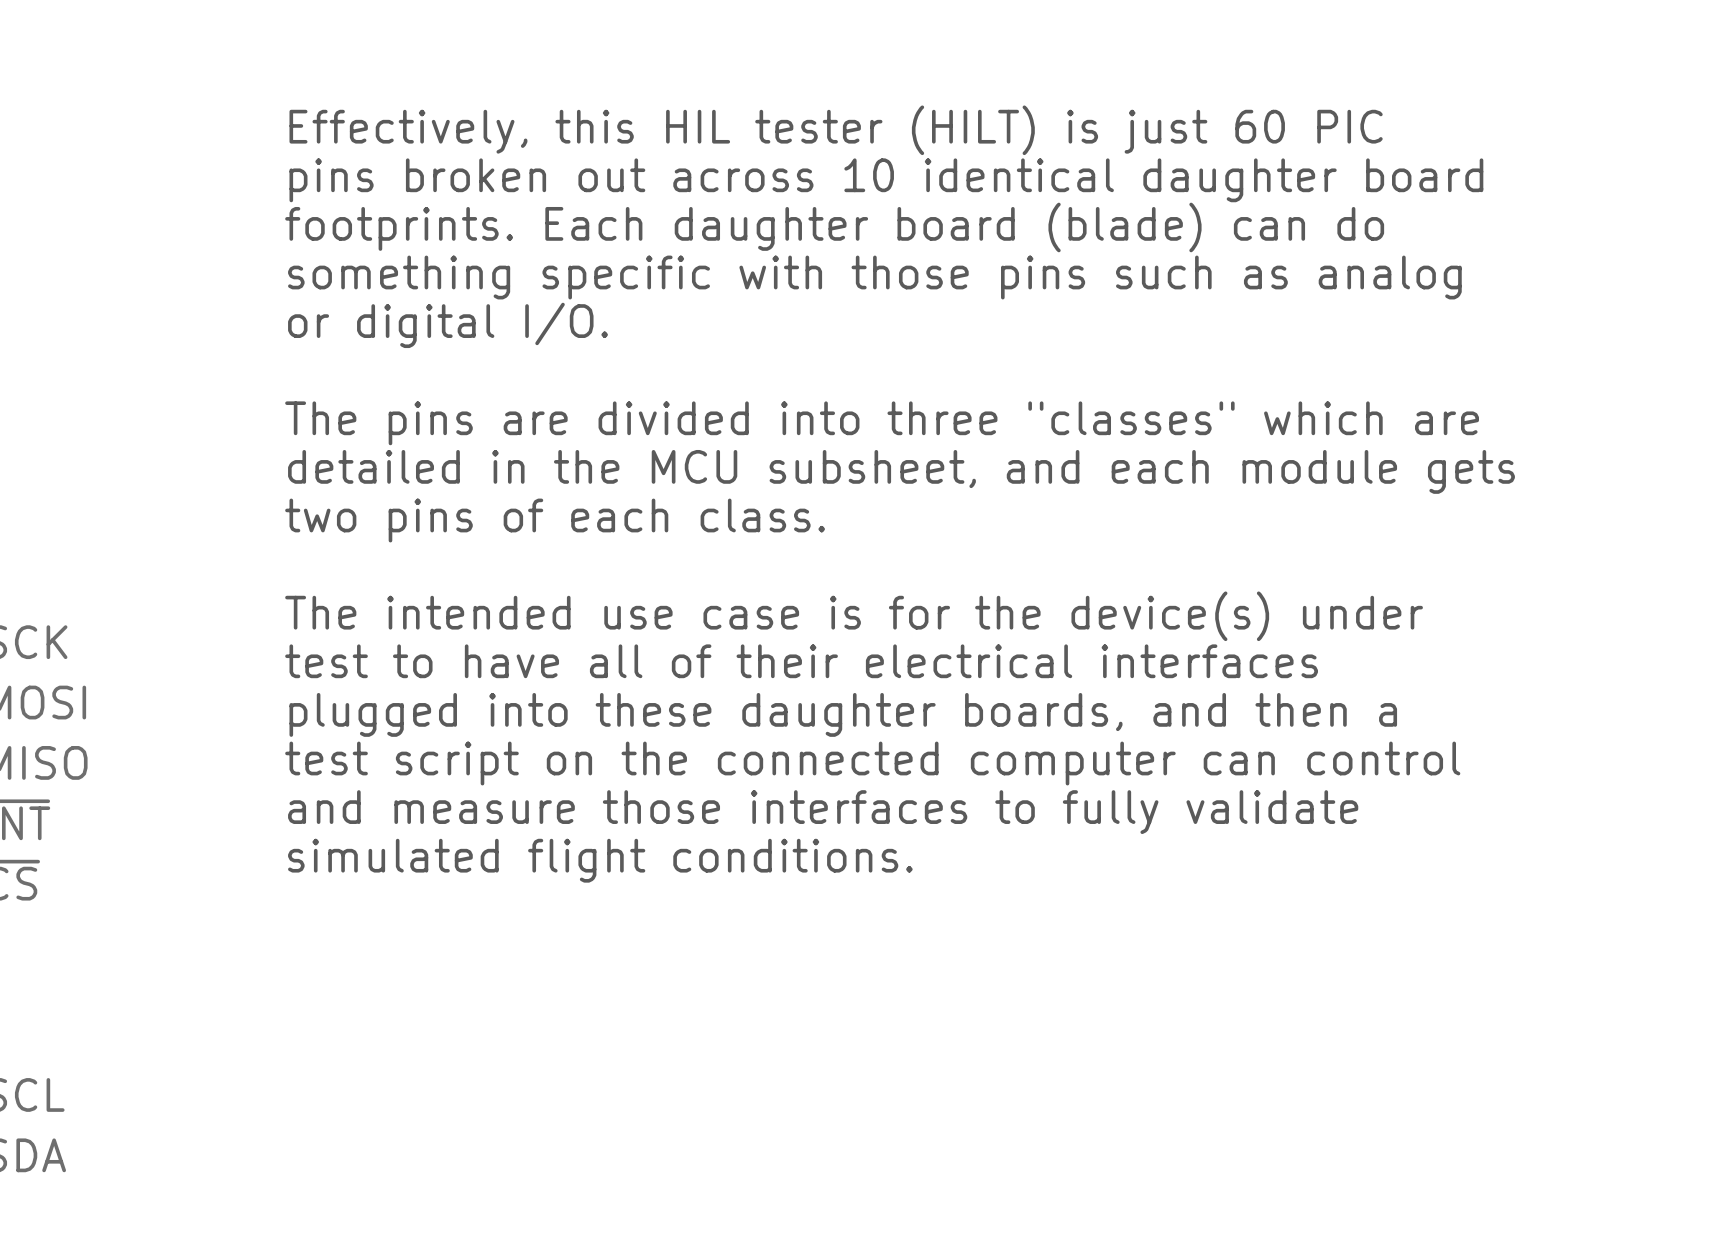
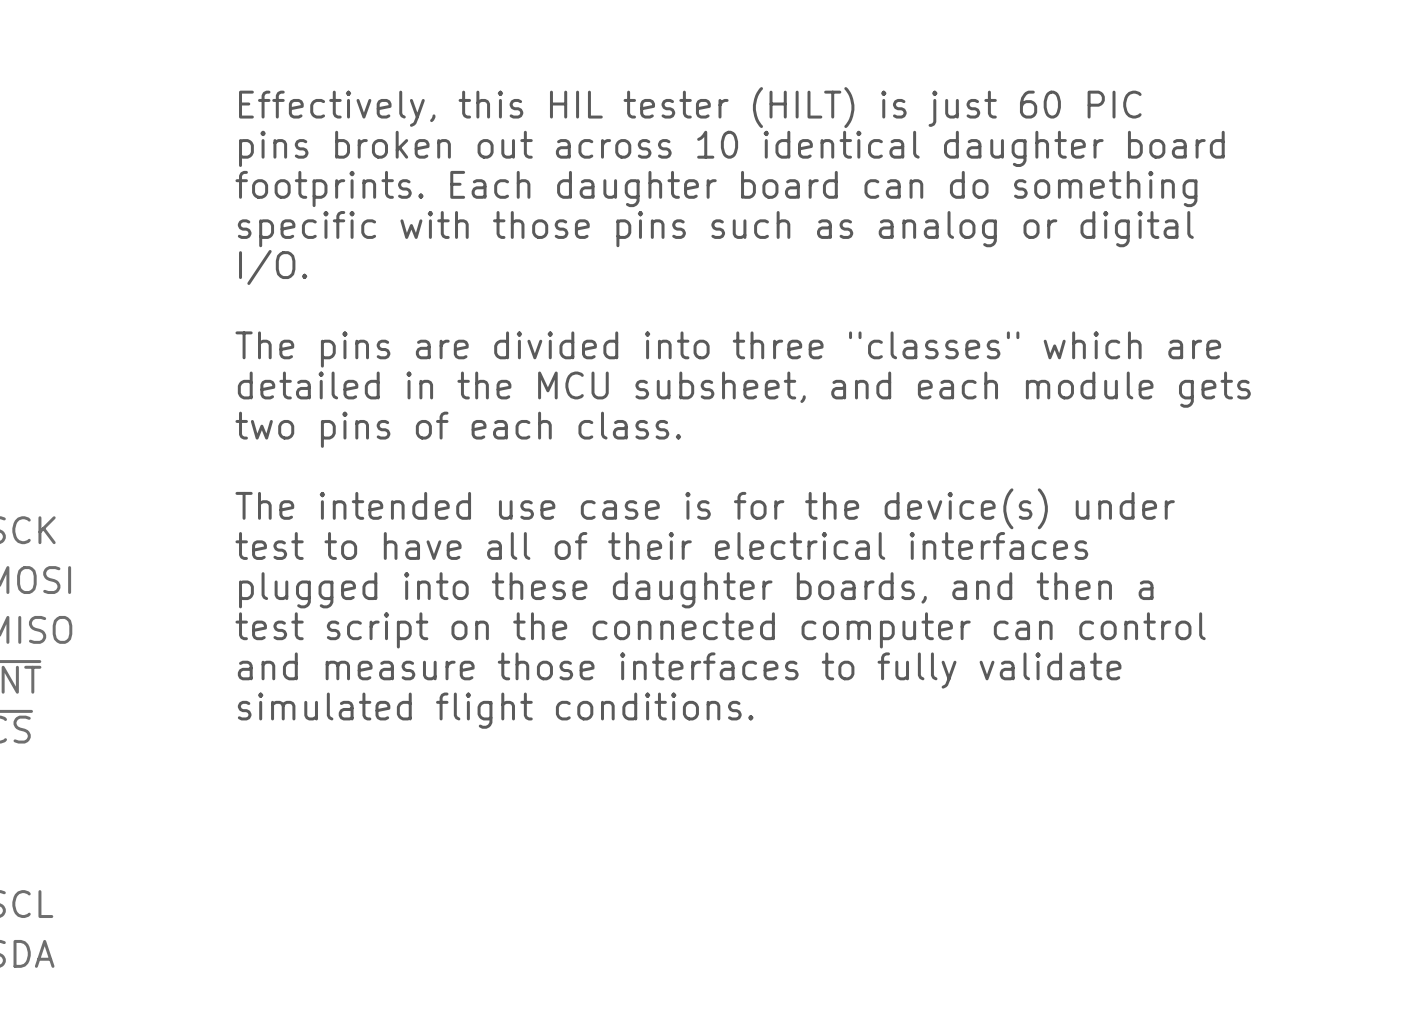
text: footprints. Each daughter board (blade) can do (834, 227) -> footprints. Each daughter board can do something (716, 189)
text: something specific with those pins such as analog (874, 277) -> specific with those pins such as analog or digital (715, 229)
text: or digital I/O. (447, 325) -> I/O. (273, 267)

